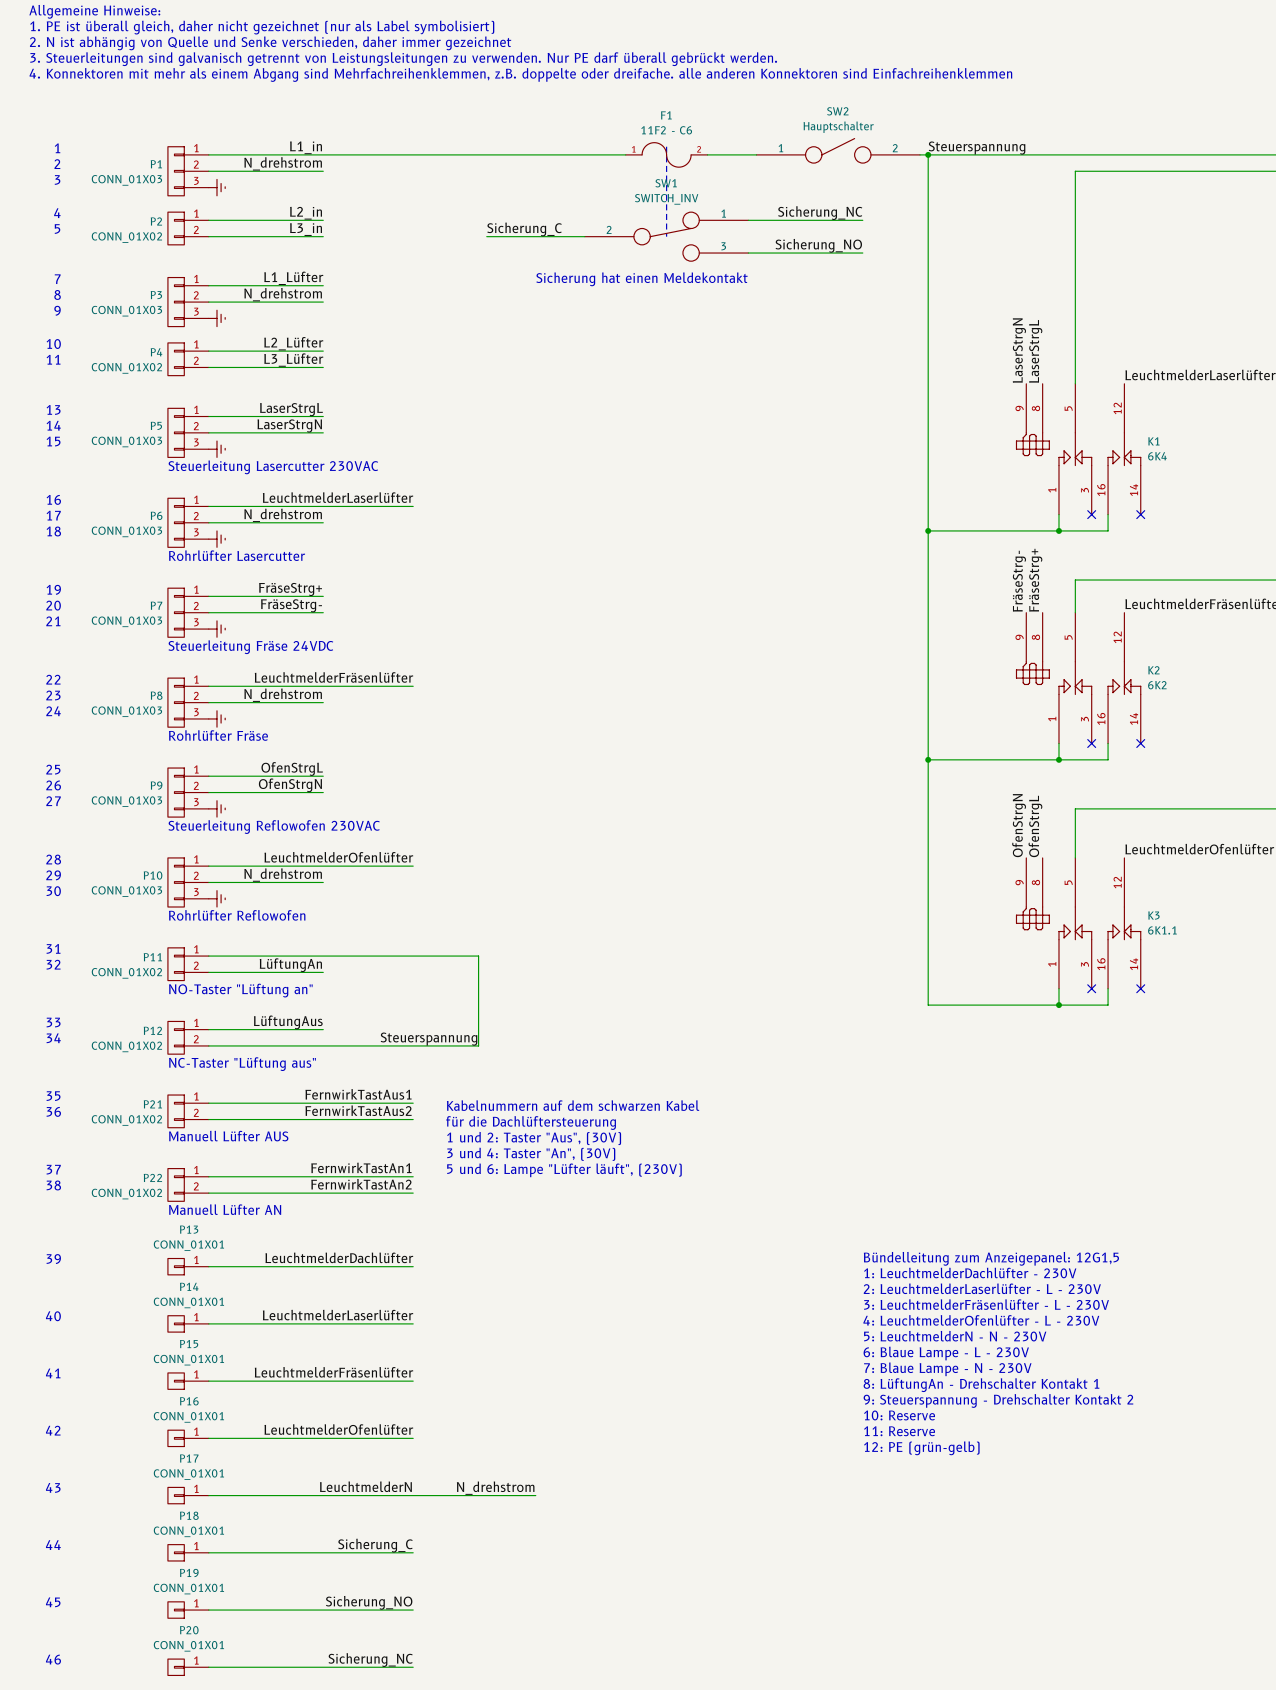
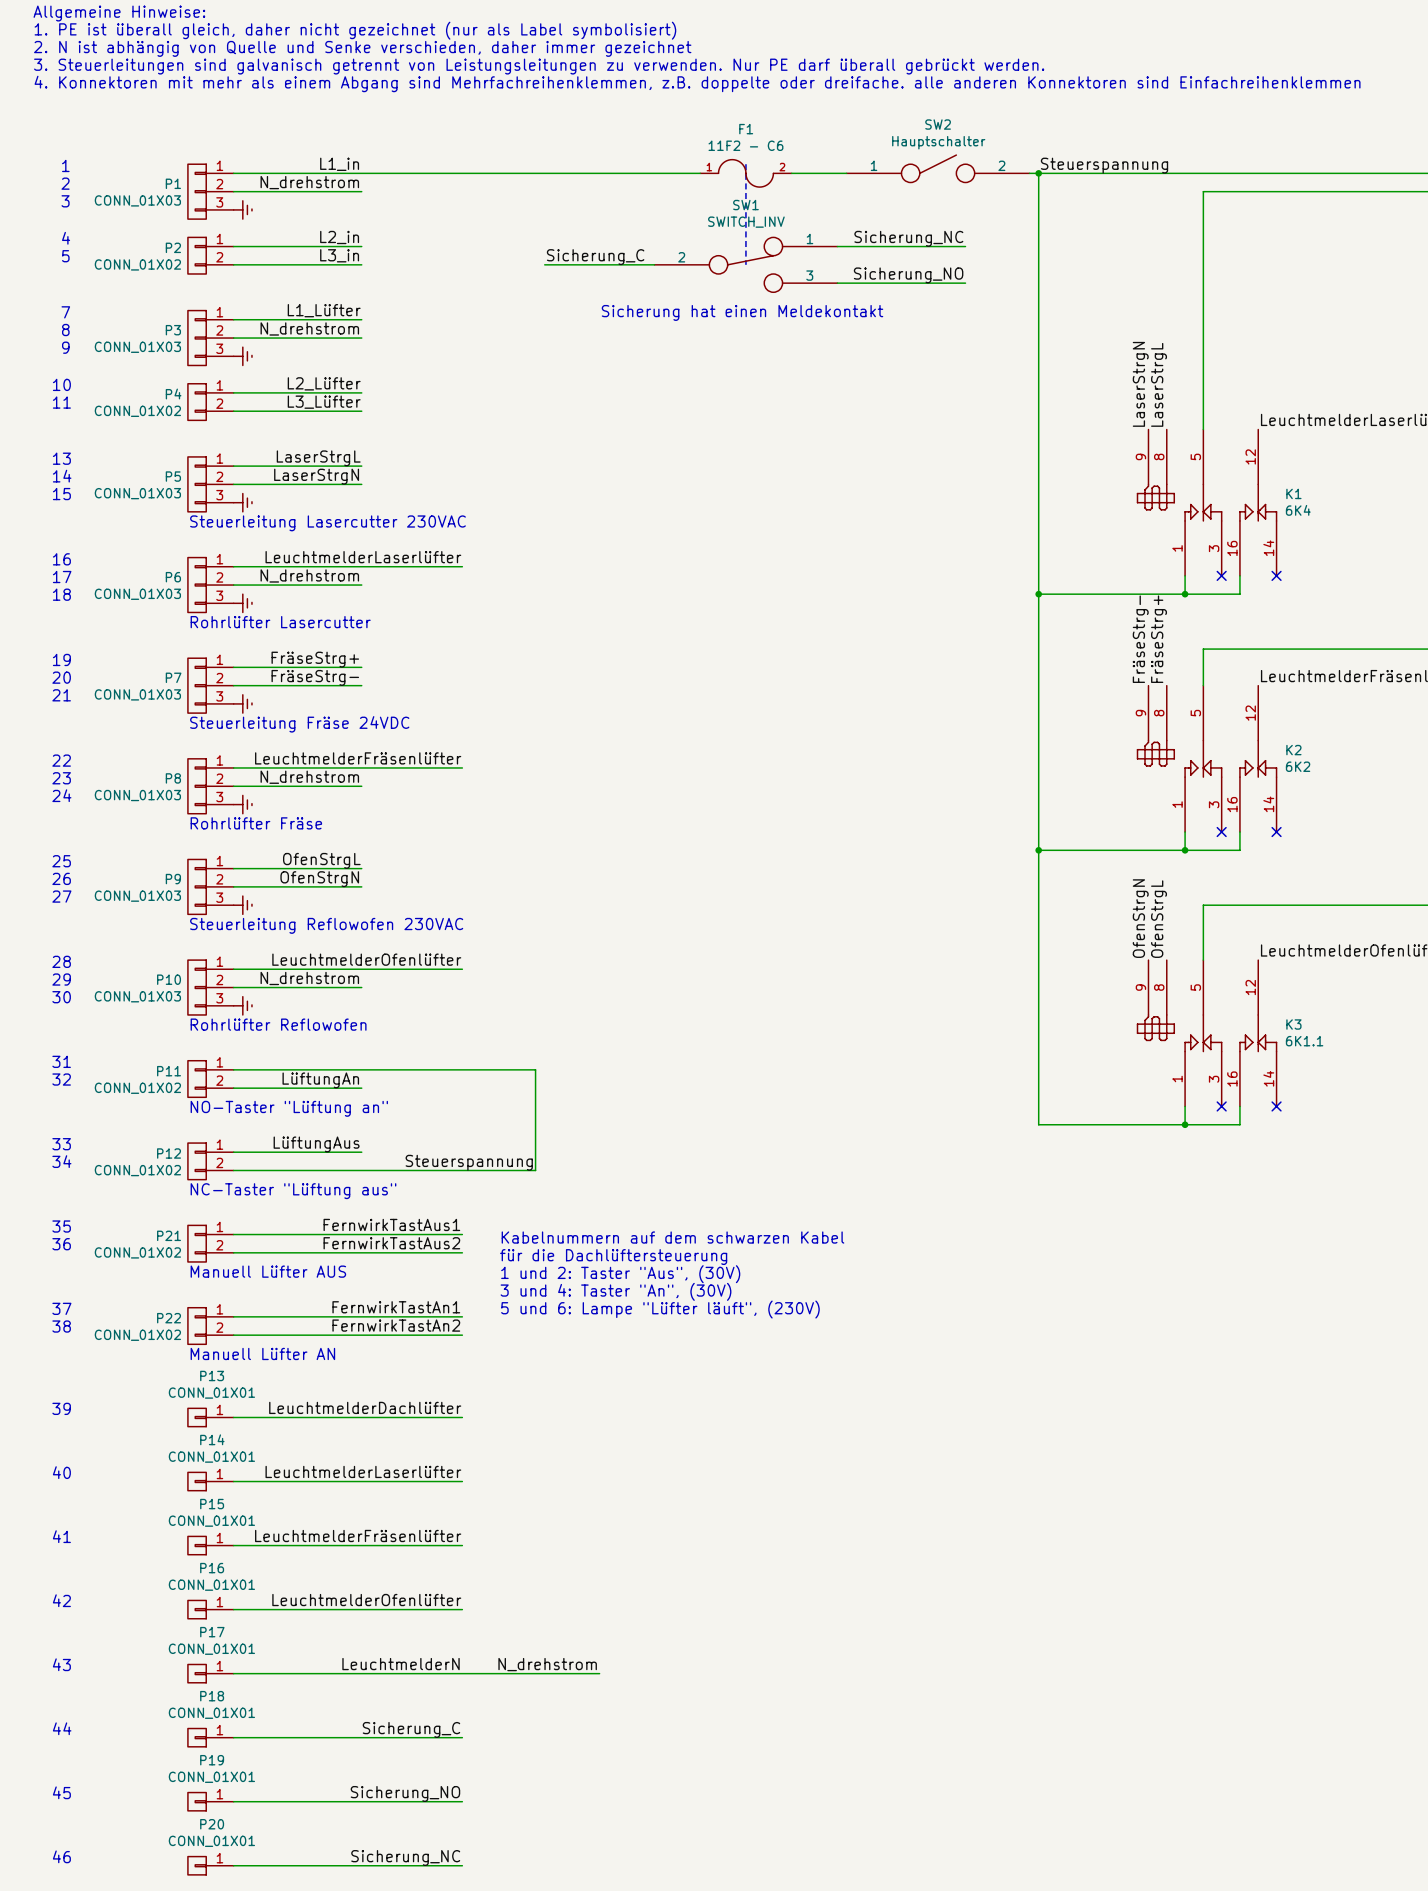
text: Bündelleitung zum Anzeigepanel: 12G1,5 (991, 1258) -> none
text: 1: LeuchtmelderDachlüfter - 230V (970, 1273) -> none
text: 2: LeuchtmelderLaserlüfter - L - 230V (982, 1288) -> none
text: 3: LeuchtmelderFräsenlüfter - L - 230V (986, 1304) -> none
text: 4: LeuchtmelderOfenlüfter - L - 230V (981, 1320) -> none
text: 5: LeuchtmelderN - N - 230V (955, 1336) -> none
text: 6: Blaue Lampe - L - 230V (946, 1353) -> none
text: 7: Blaue Lampe - N - 230V (947, 1369) -> none
text: 8: LüftungAn - Drehschalter Kontakt 1 (981, 1385) -> none
text: 9: Steuerspannung - Drehschalter Kontakt 2 (998, 1400) -> none
text: 10: Reserve (899, 1415) -> none
text: 11: Reserve (899, 1431) -> none
text: 12: PE (grün-gelb) (921, 1448) -> none

